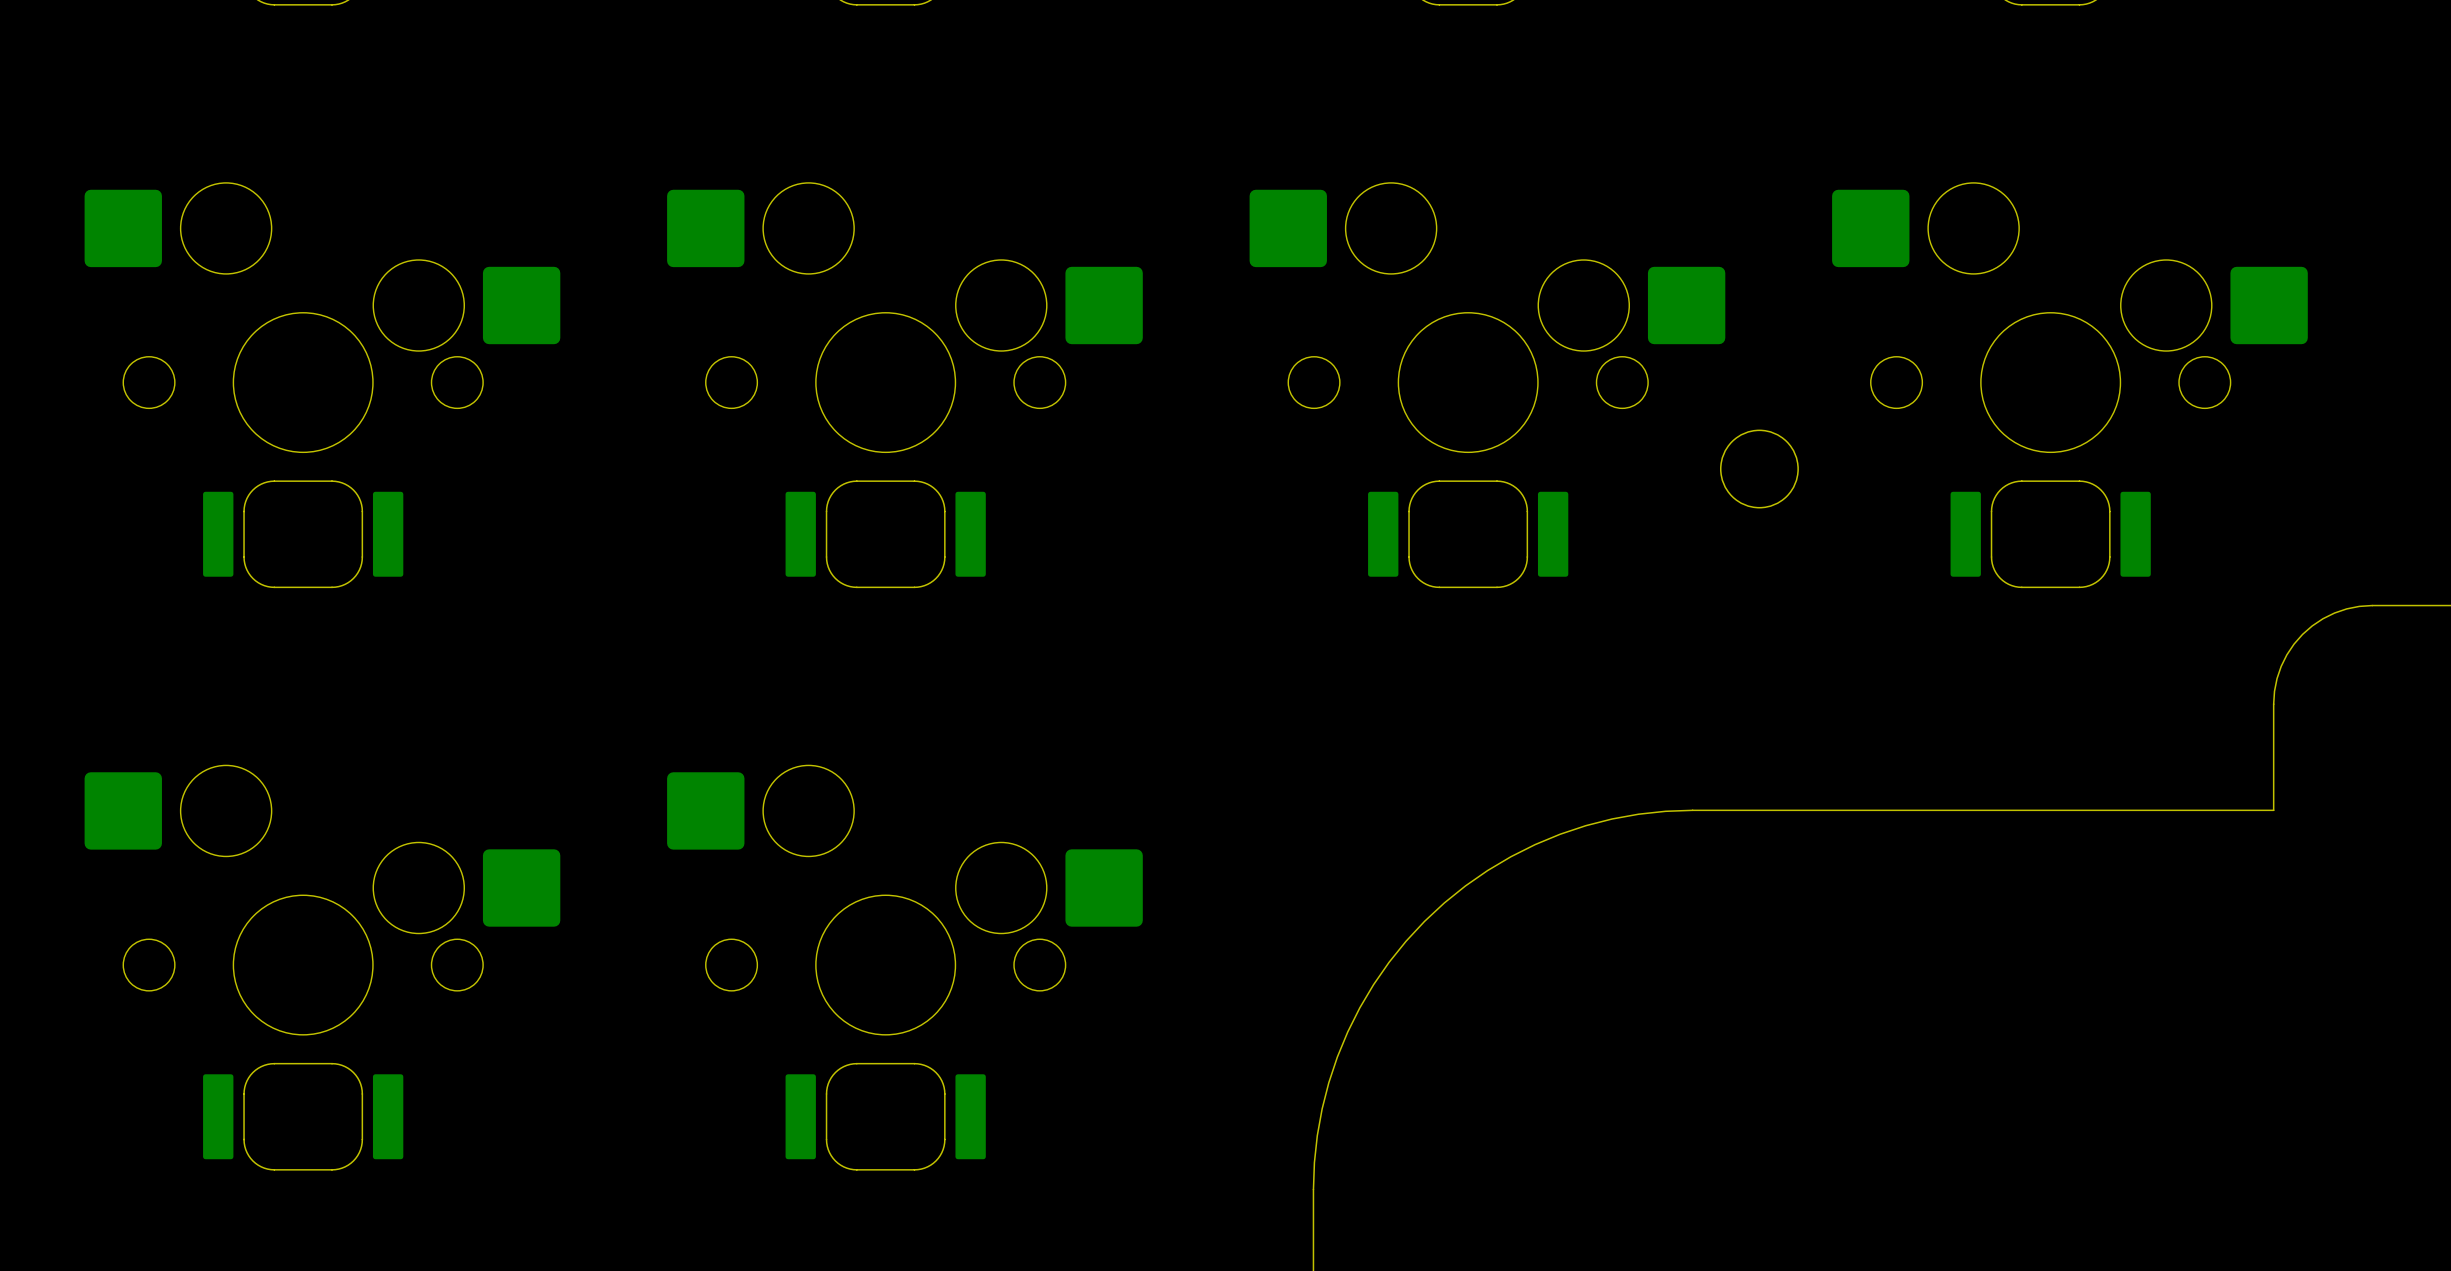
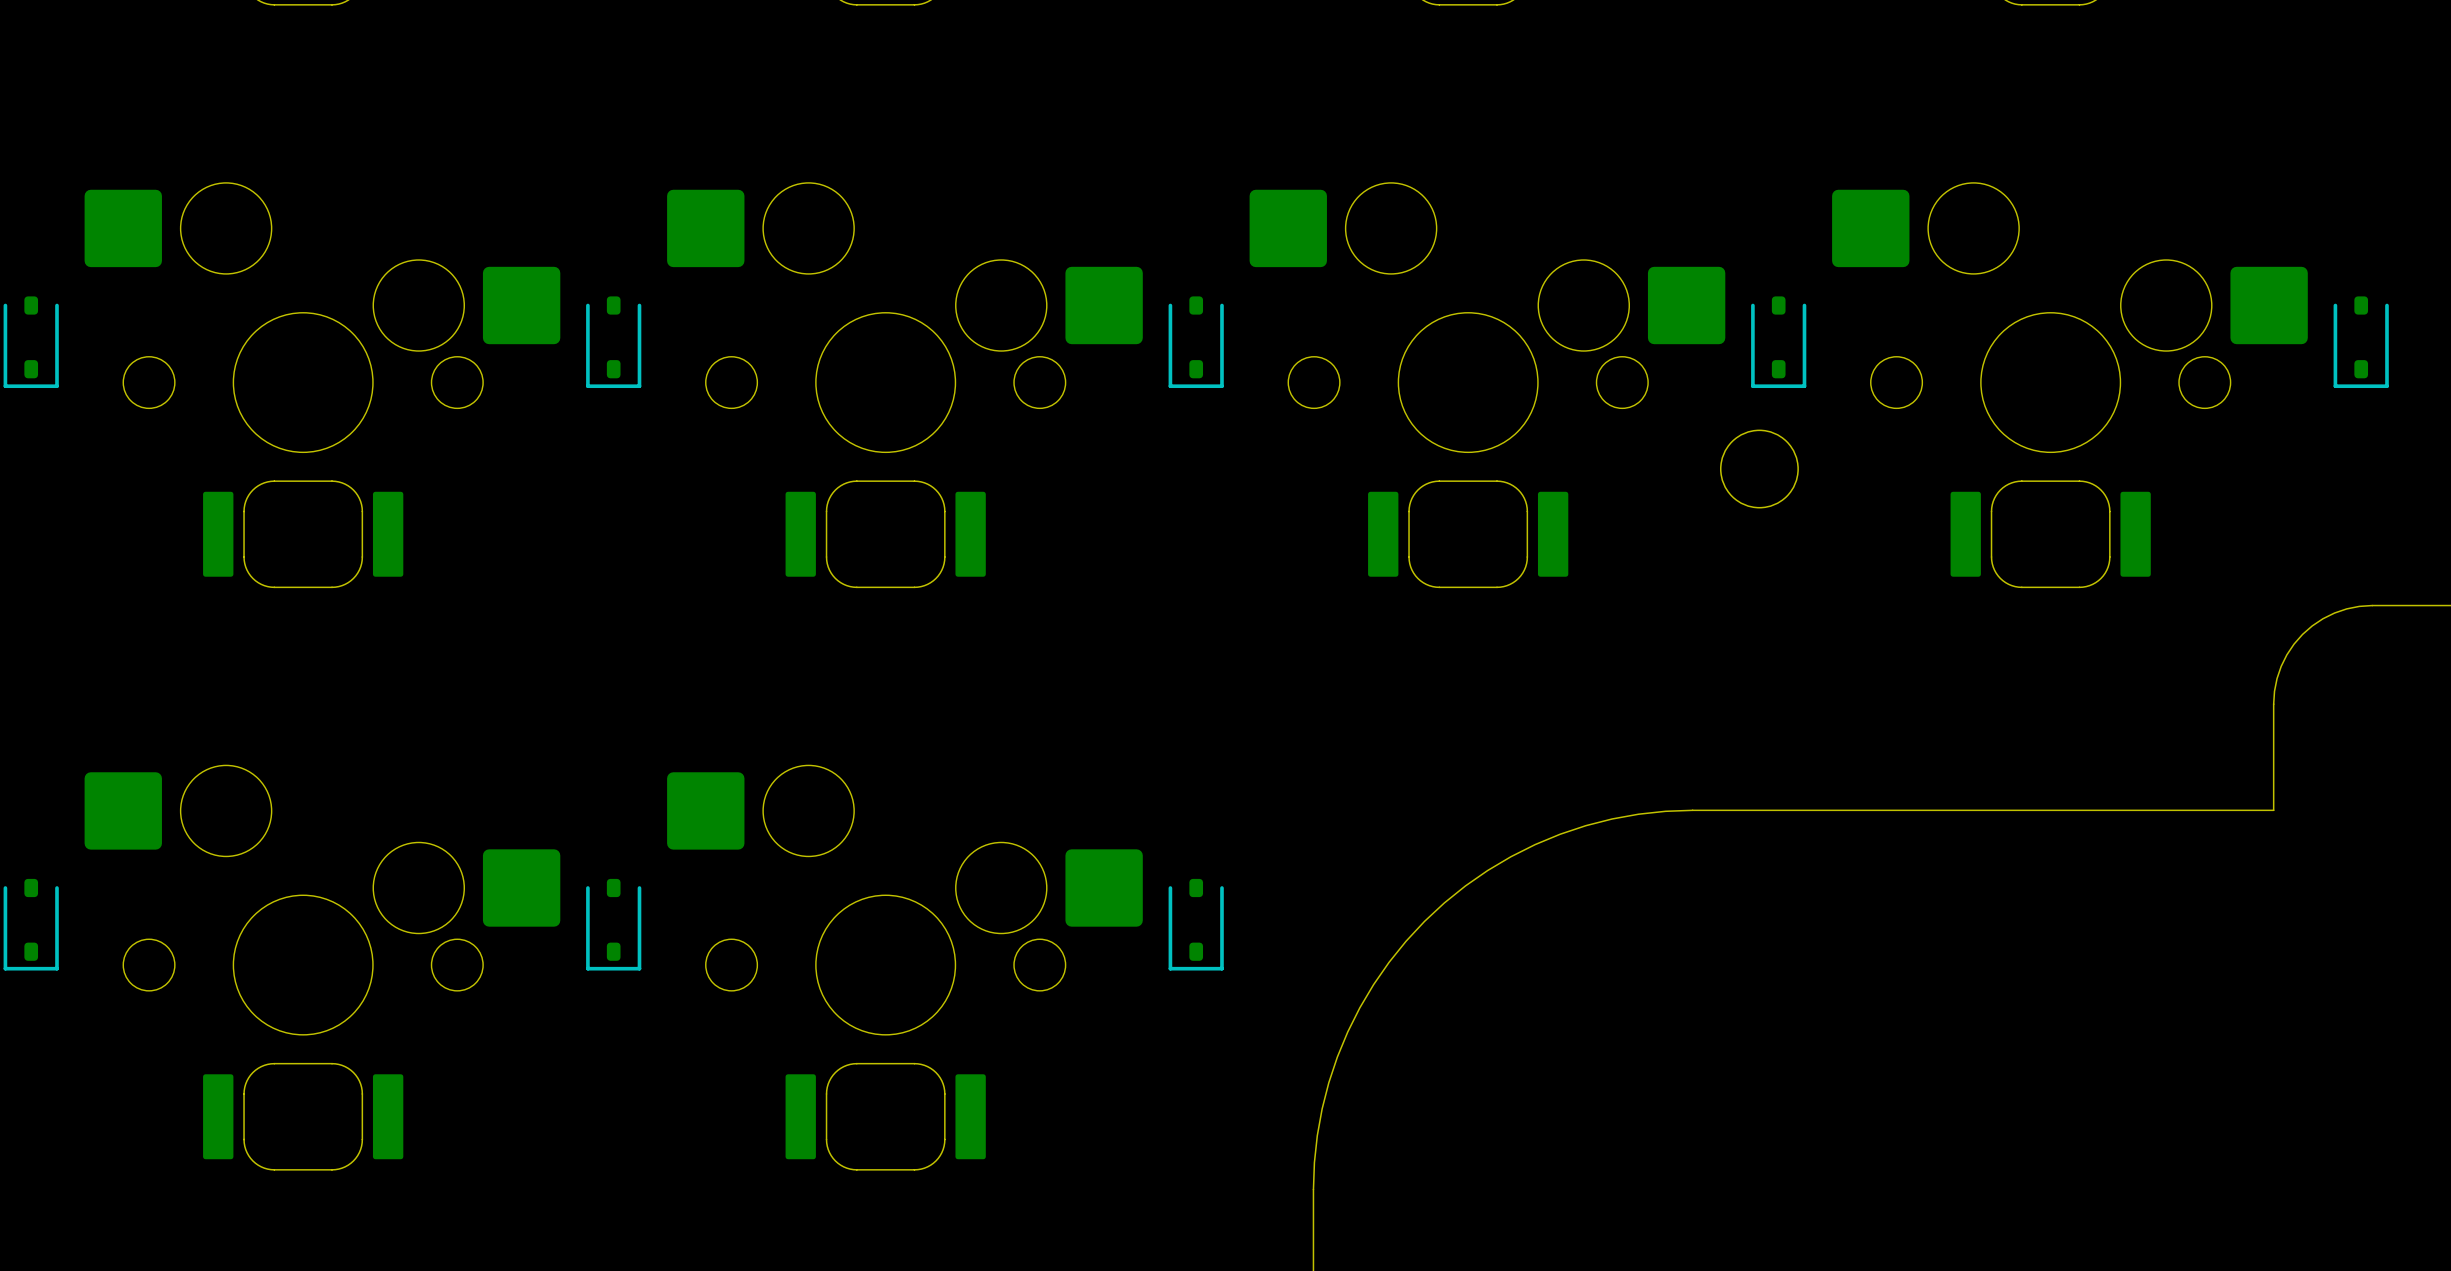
part: none -> (31, 342)
part: none -> (613, 342)
part: none -> (1196, 342)
part: none -> (1778, 342)
part: none -> (2361, 342)
part: none -> (31, 924)
part: none -> (613, 924)
part: none -> (1196, 924)

